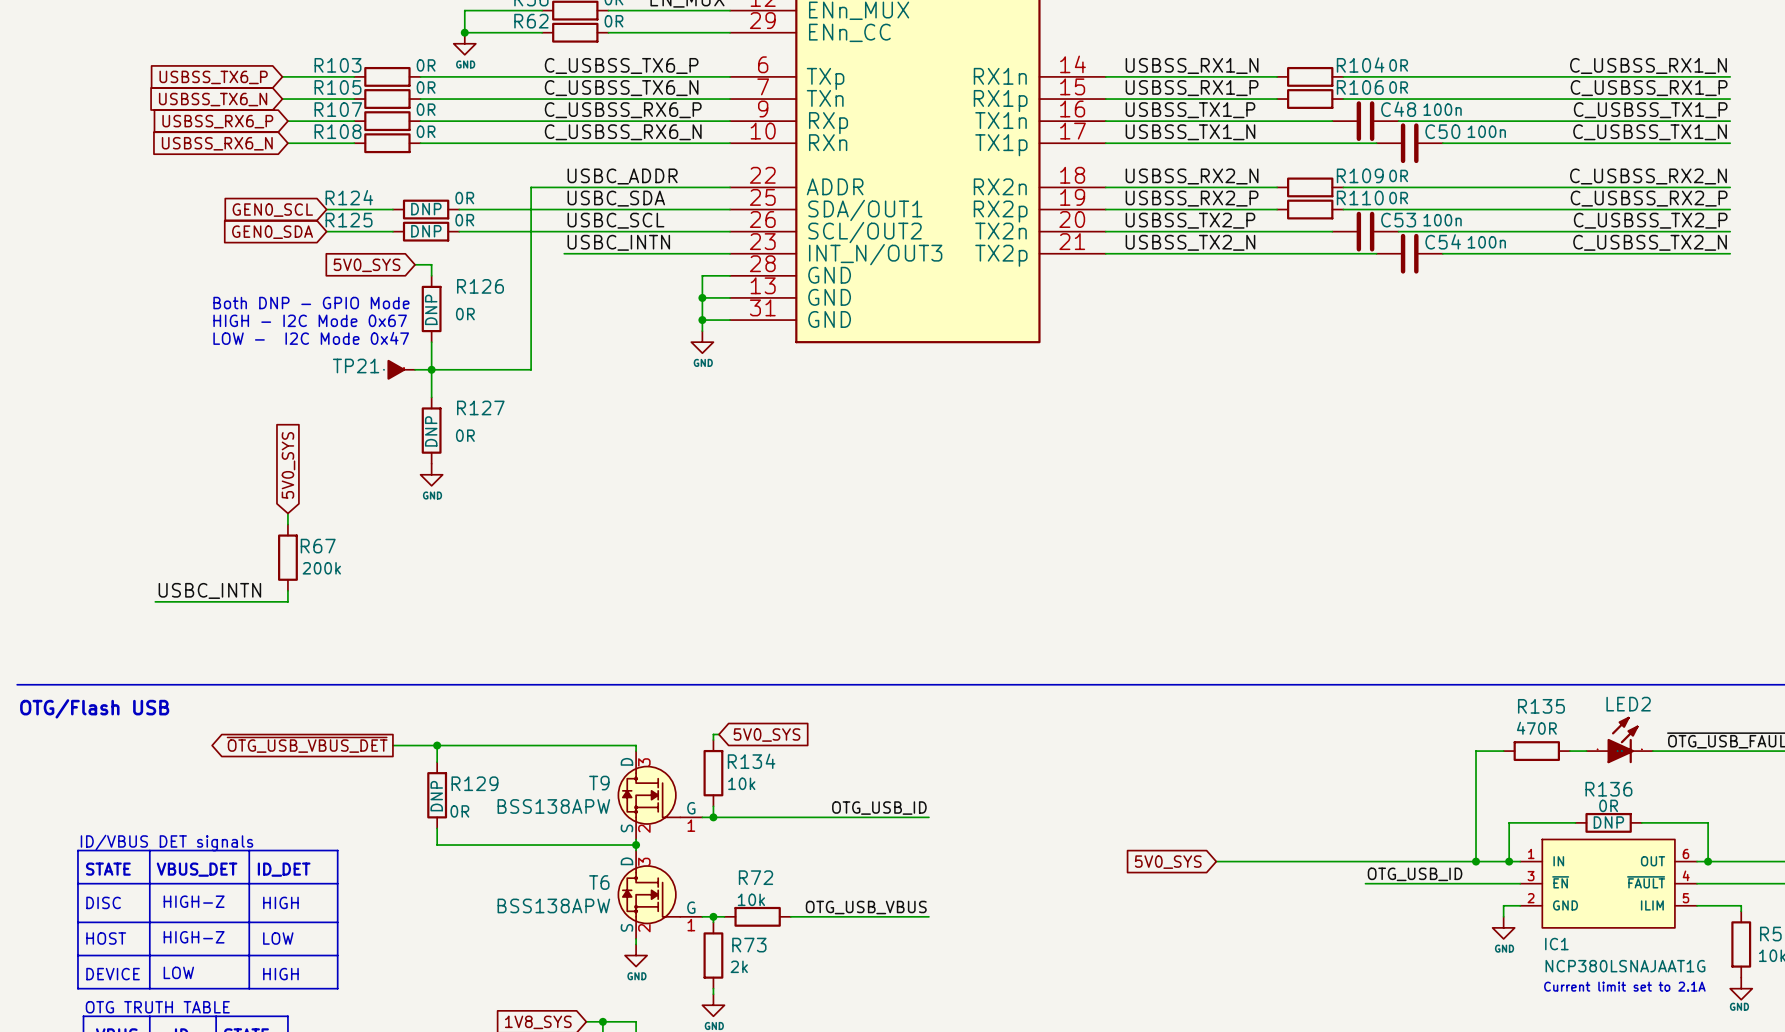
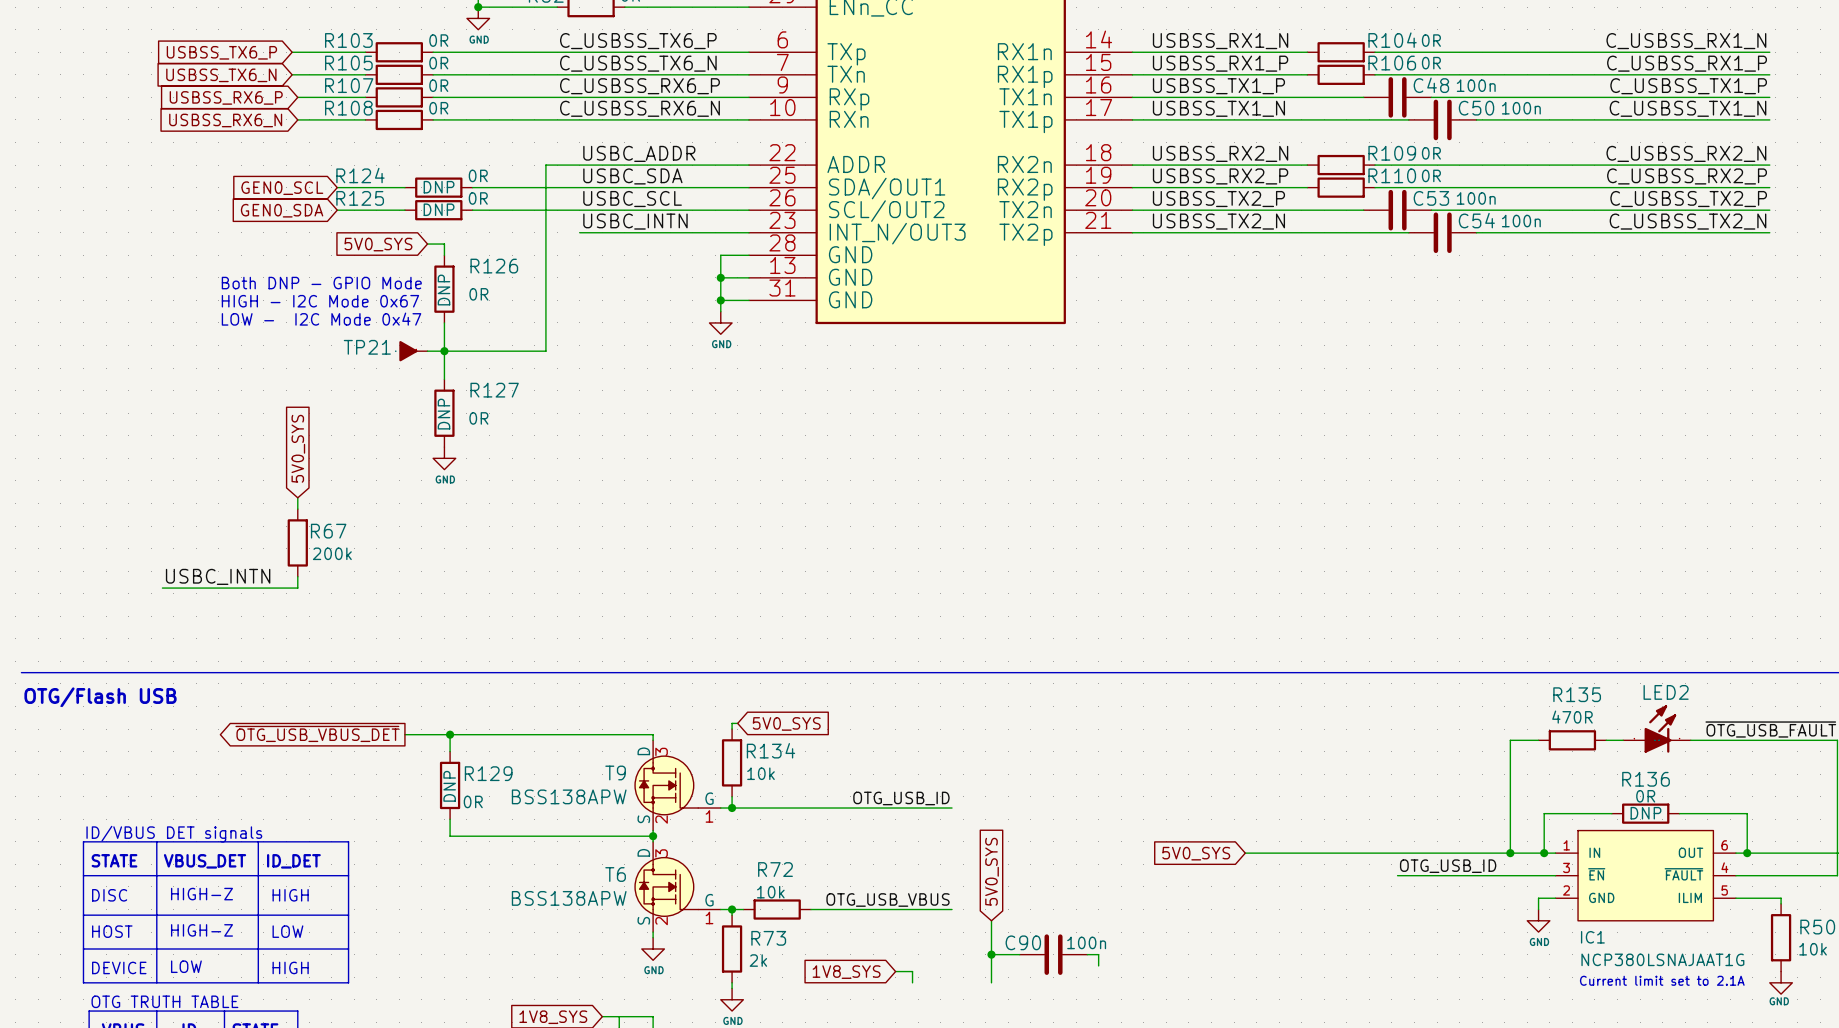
global label: none -> 5V0_SYS (992, 871)
wire: none -> (991, 920) (991, 982)
wire: none -> (991, 954) (1019, 954)
junction: none -> (991, 954)
C90: none -> (1053, 954)
wire: none -> (1087, 954) (1098, 954) (1098, 965)
wire: none -> (895, 971) (912, 971) (912, 982)
global label: none -> 1V8_SYS (846, 972)
junction: (602, 1021) -> none

